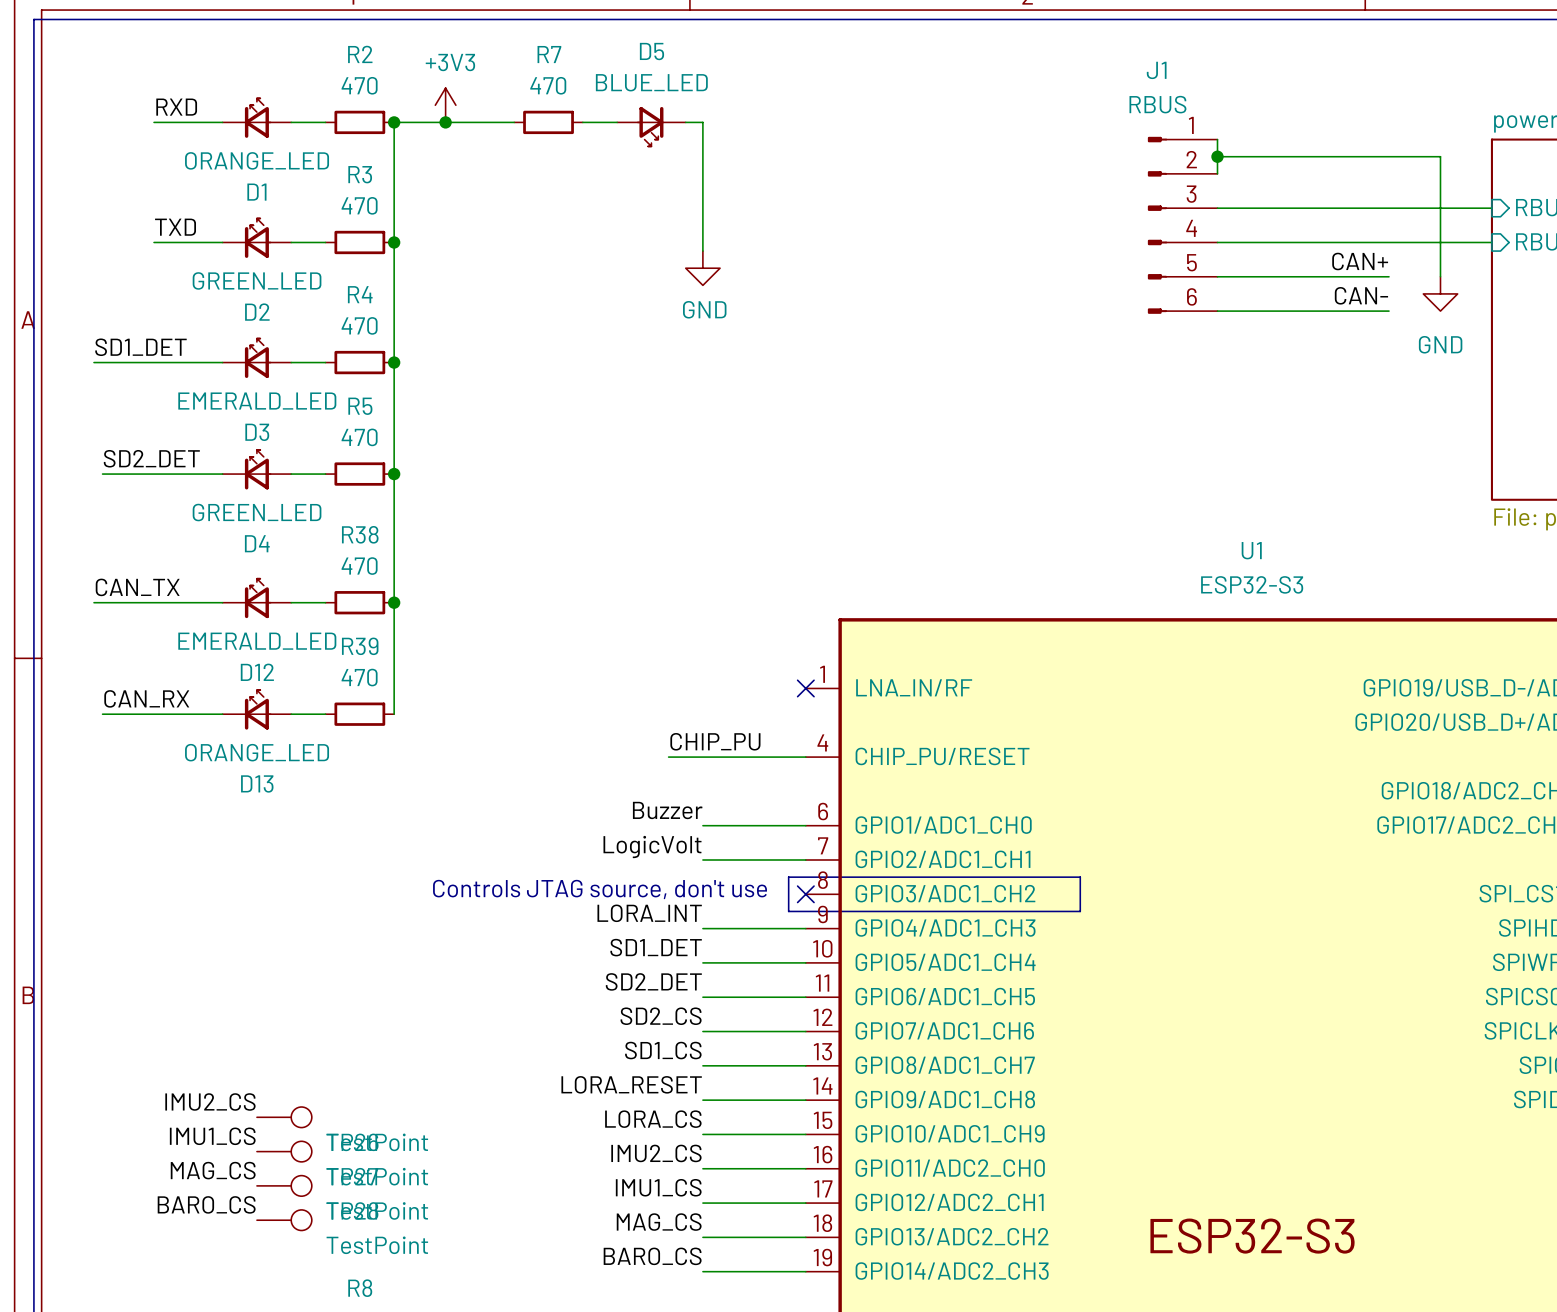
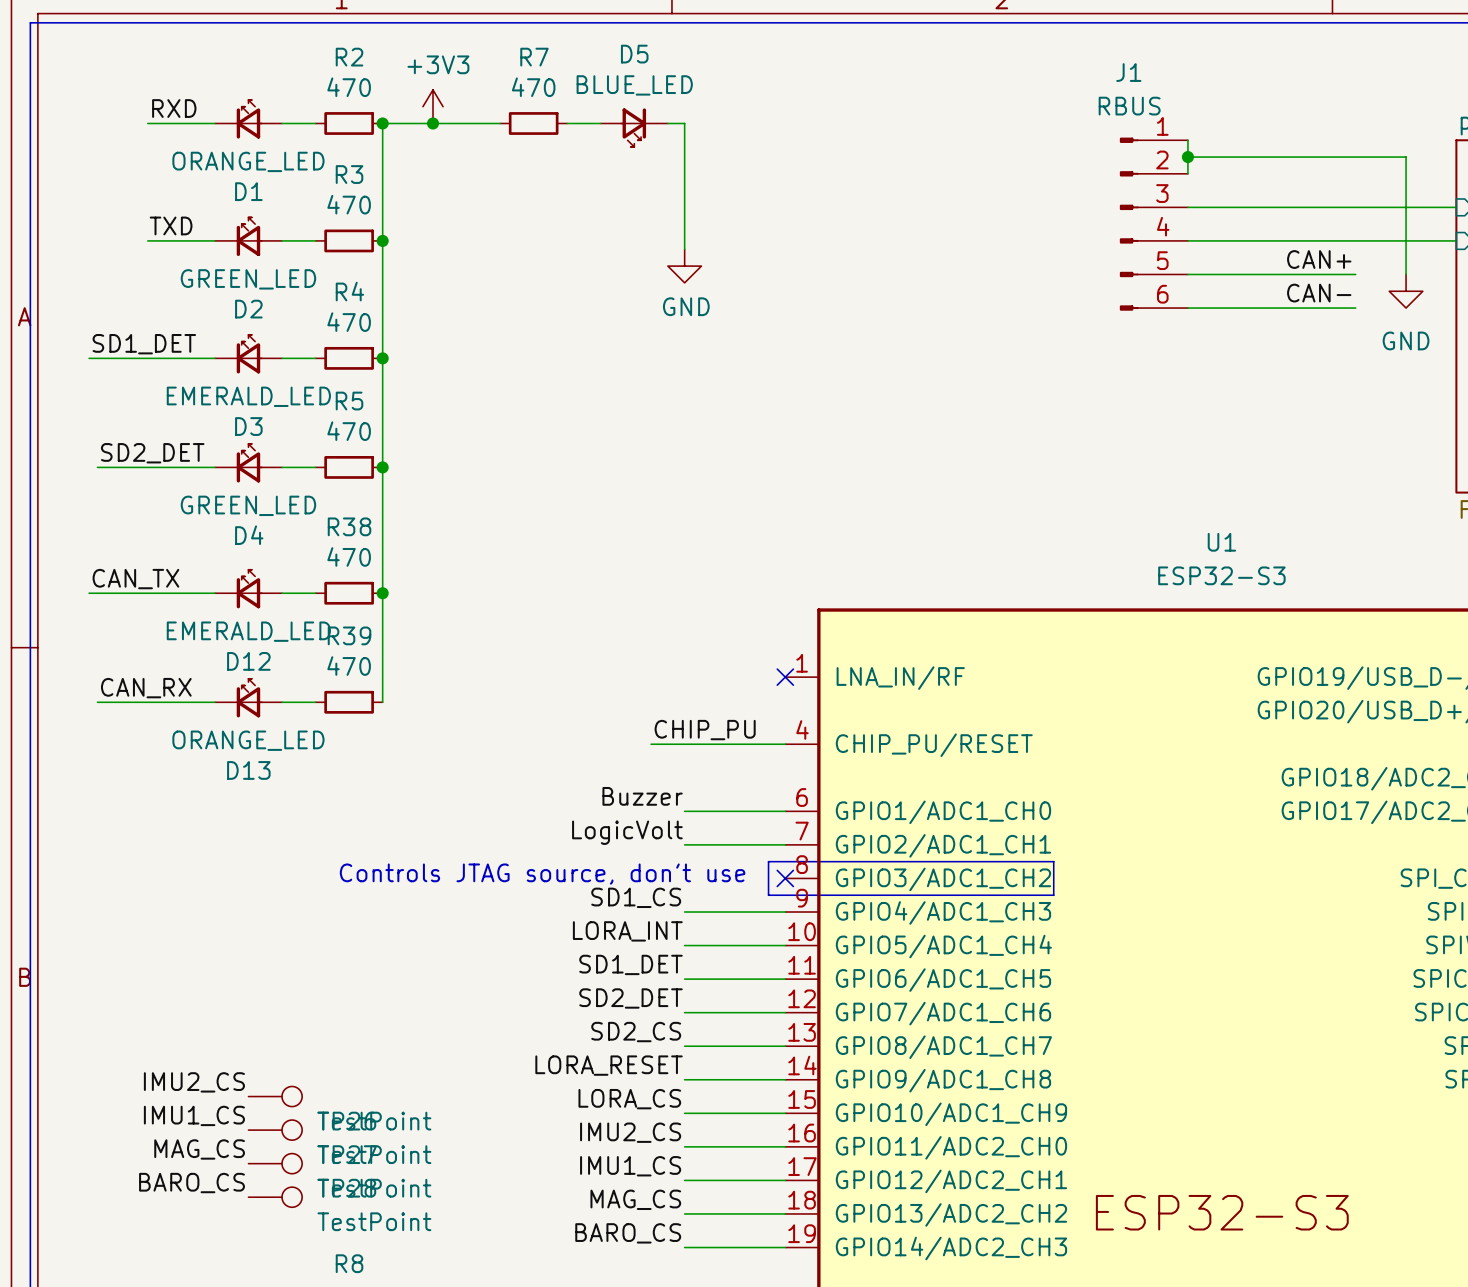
label: LORA_INT (649, 913) -> SD1_CS (636, 897)
label: SD1_DET (656, 947) -> LORA_INT (627, 931)
label: SD2_DET (653, 981) -> SD1_DET (631, 964)
label: SD2_CS (661, 1016) -> SD2_DET (631, 998)
label: SD1_CS (663, 1050) -> SD2_CS (636, 1032)

